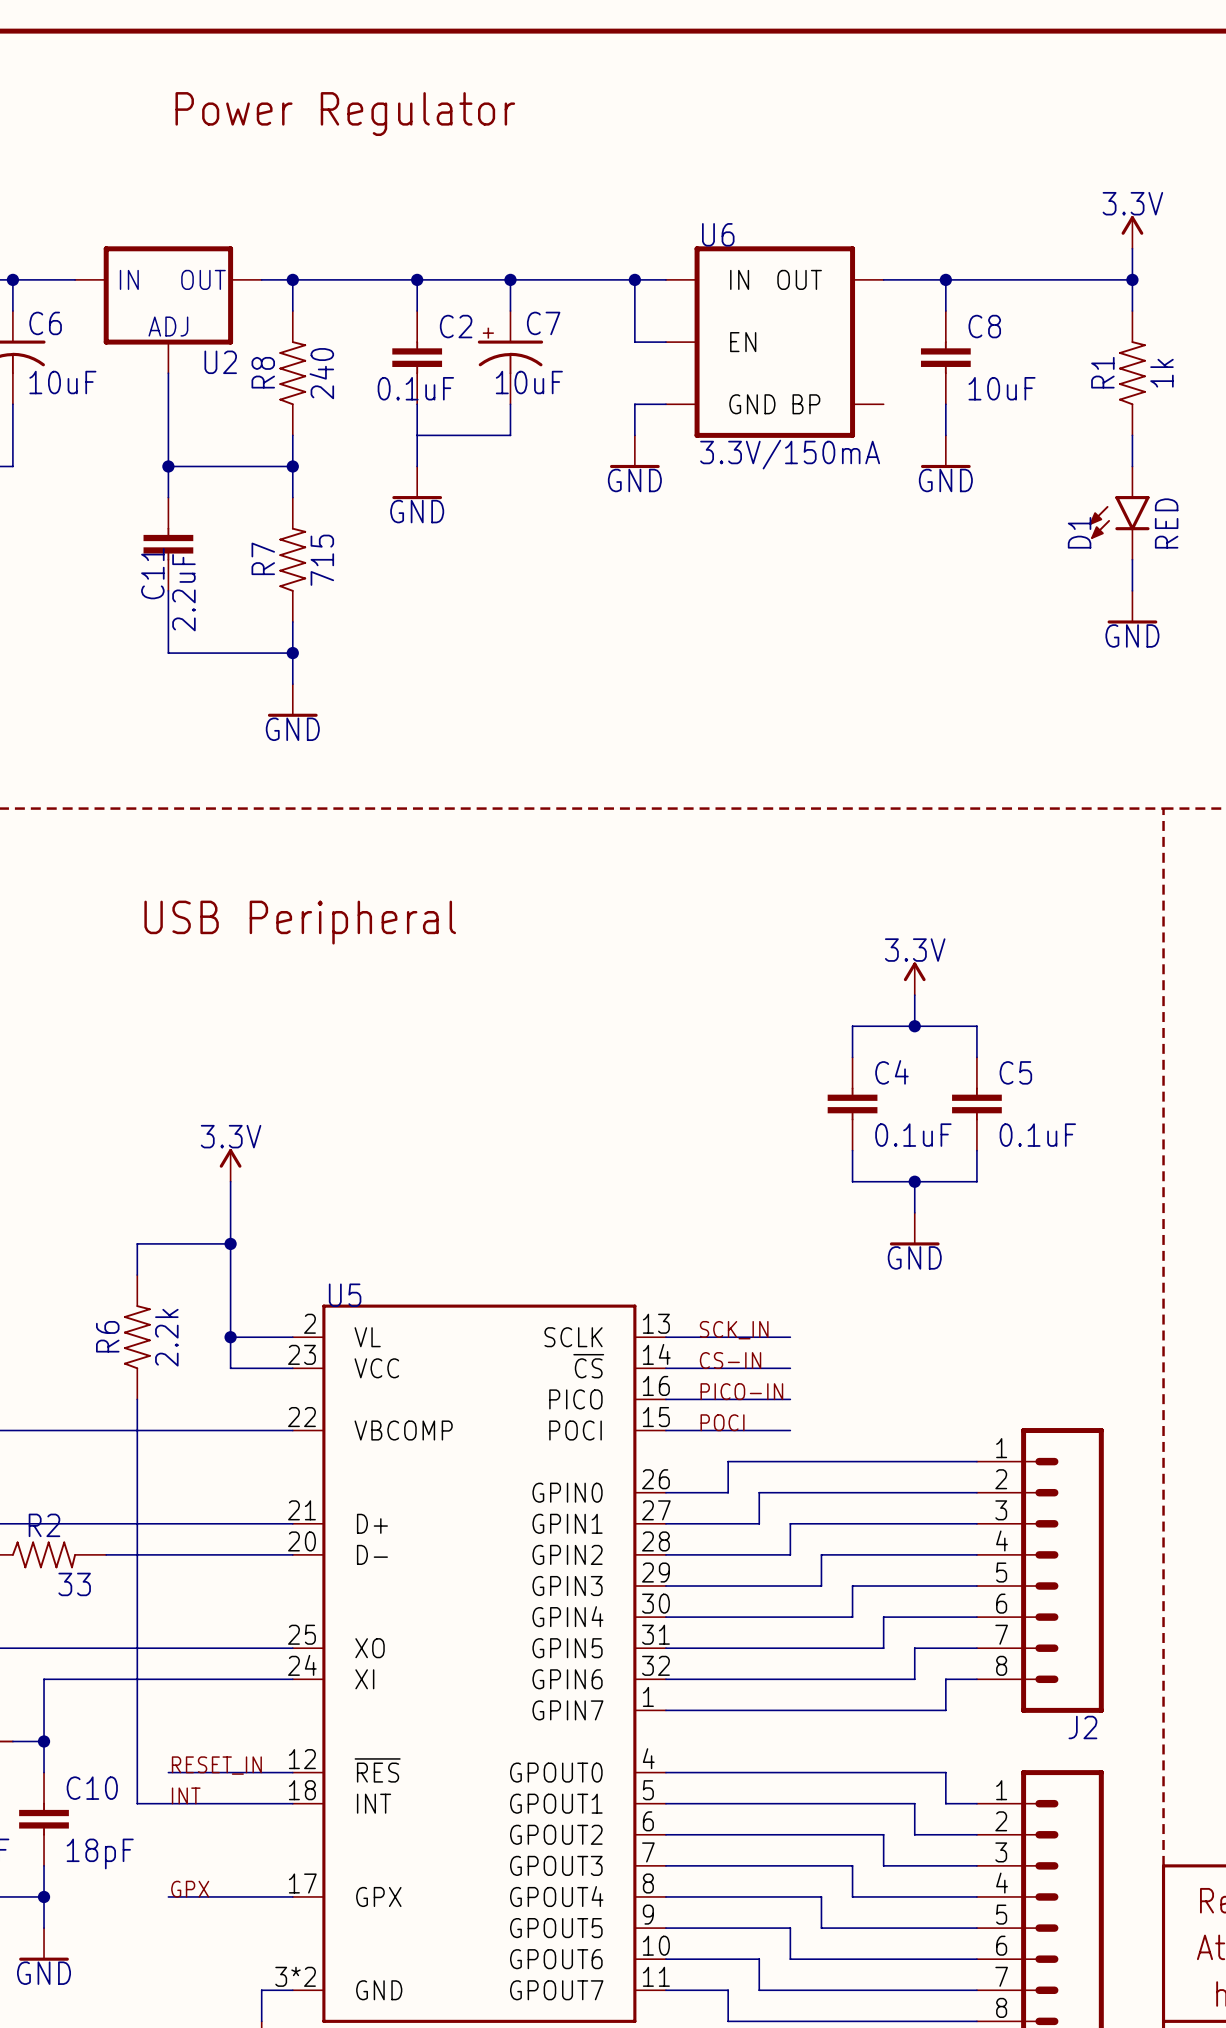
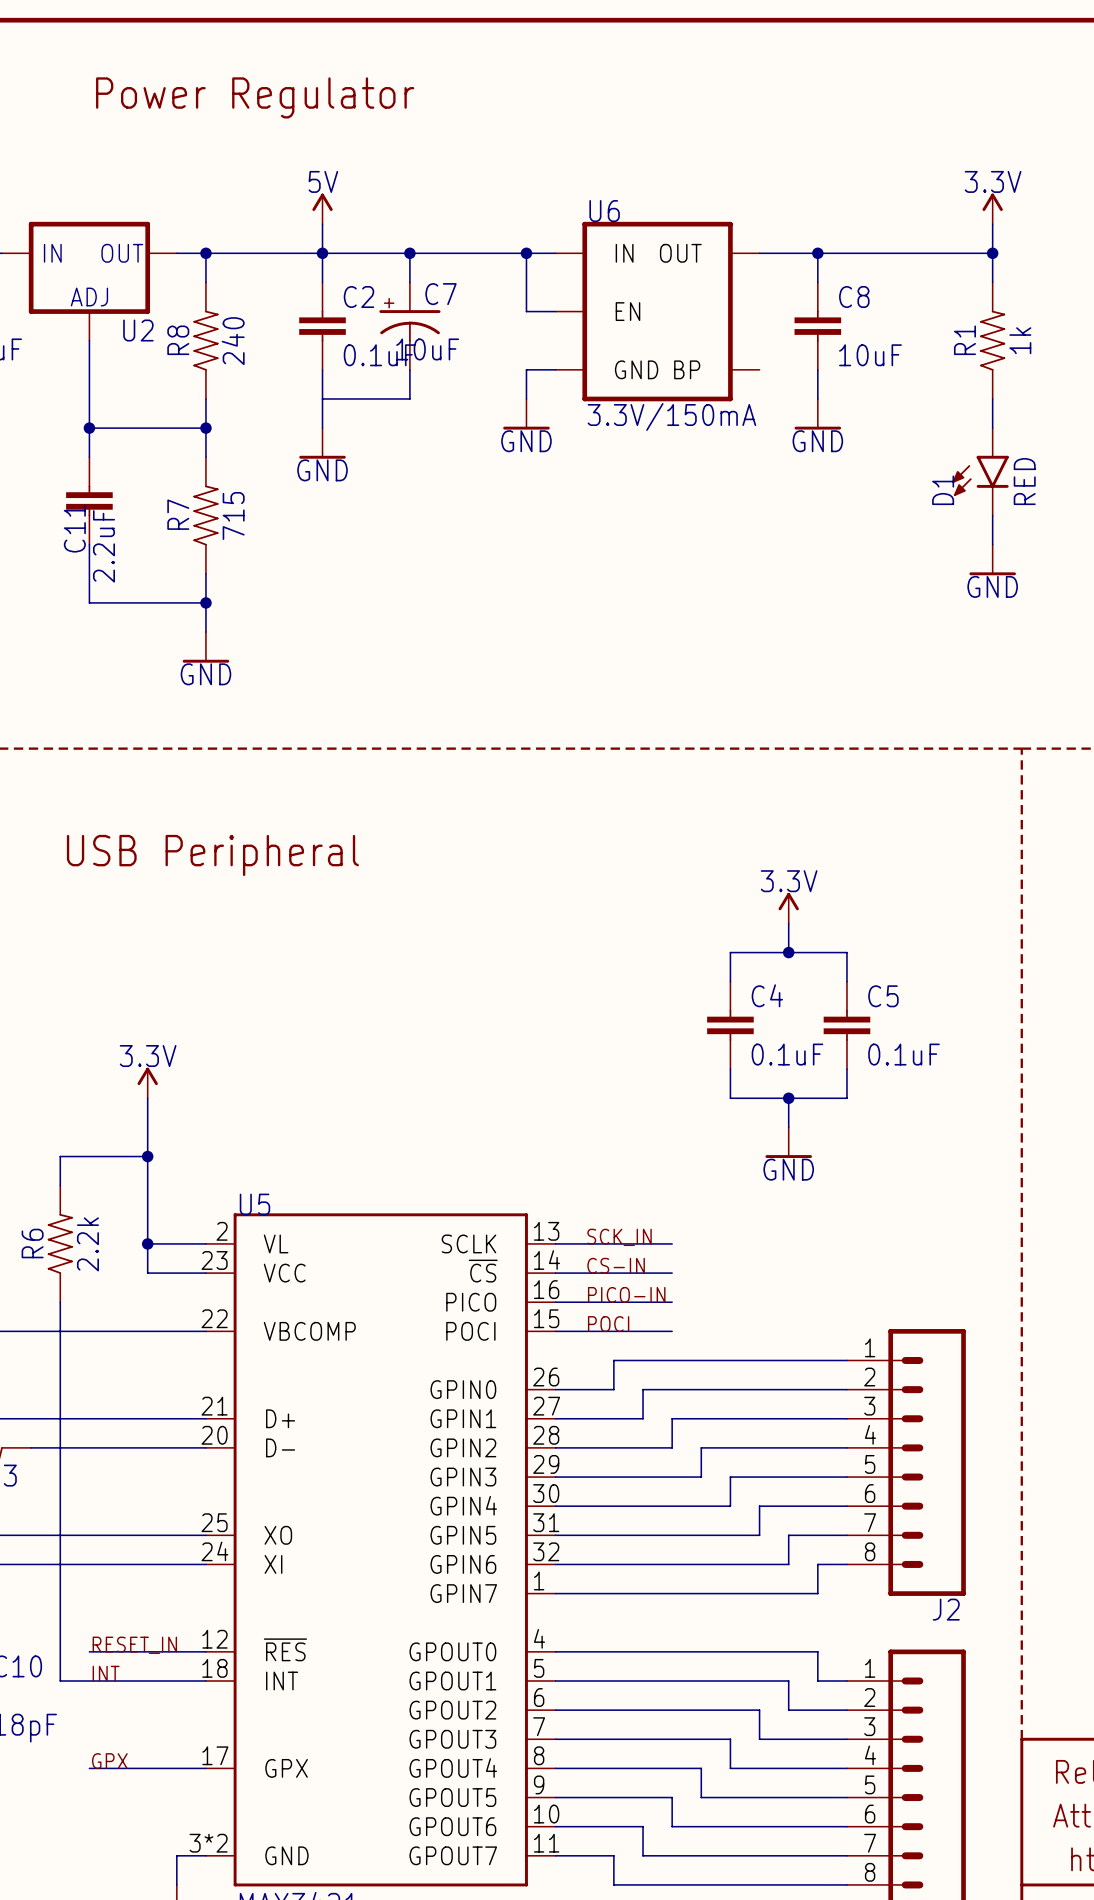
power symbol: none -> 5V (322, 208)
wire: none -> (322, 224) (322, 253)
C2 value position: 0.1uF (415, 388) -> 0.1uF (379, 355)

